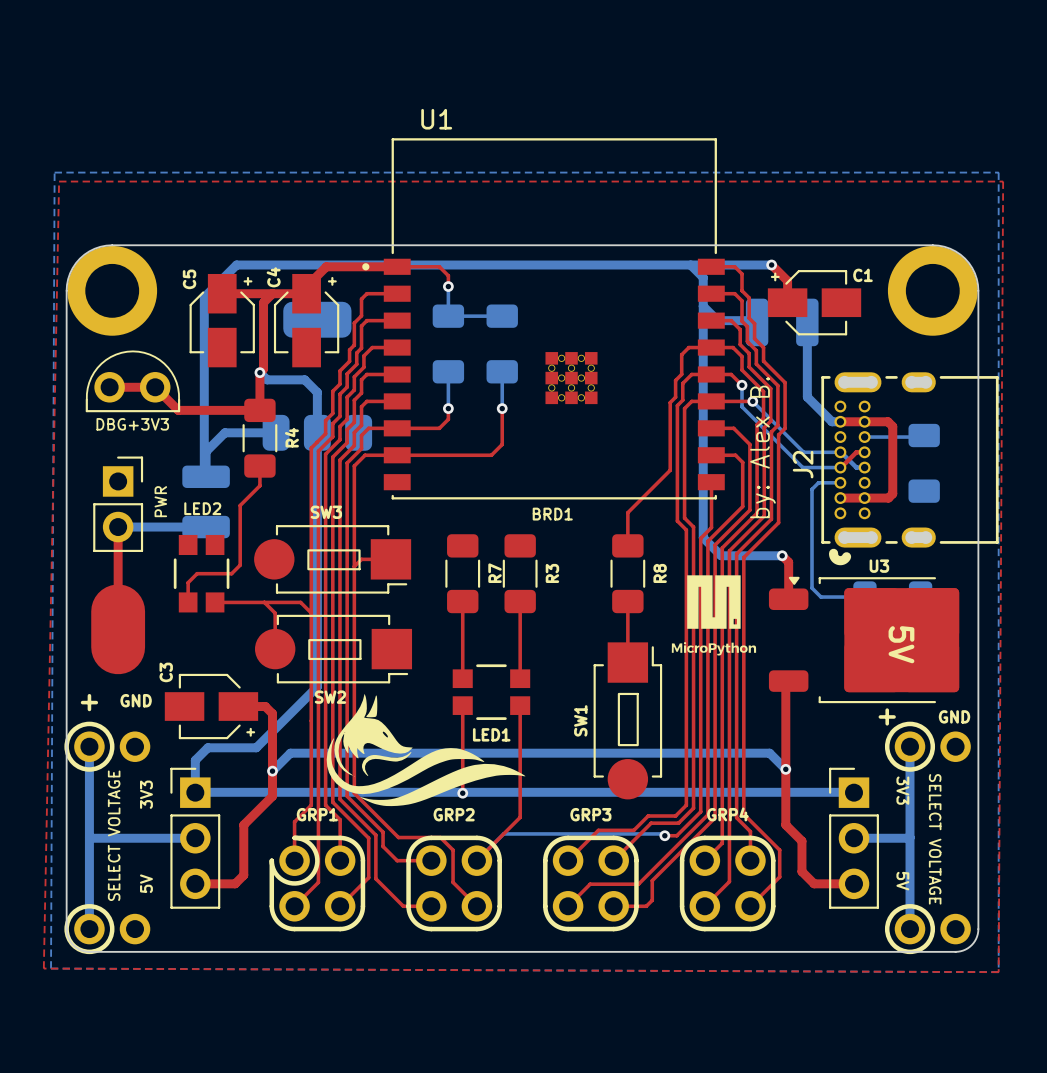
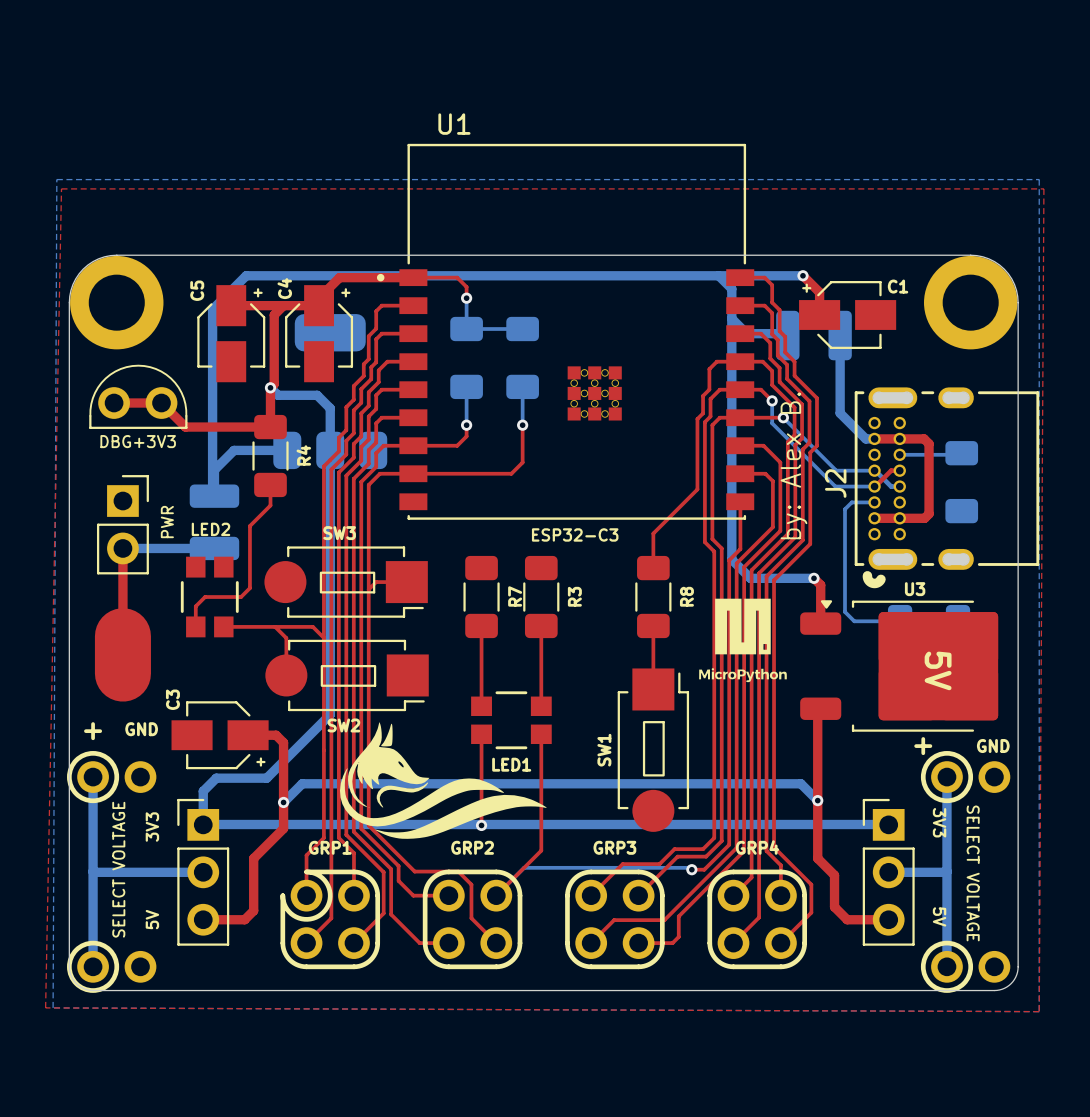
BRD1 name: BRD1 (552, 514) -> ESP32-C3 (575, 534)

